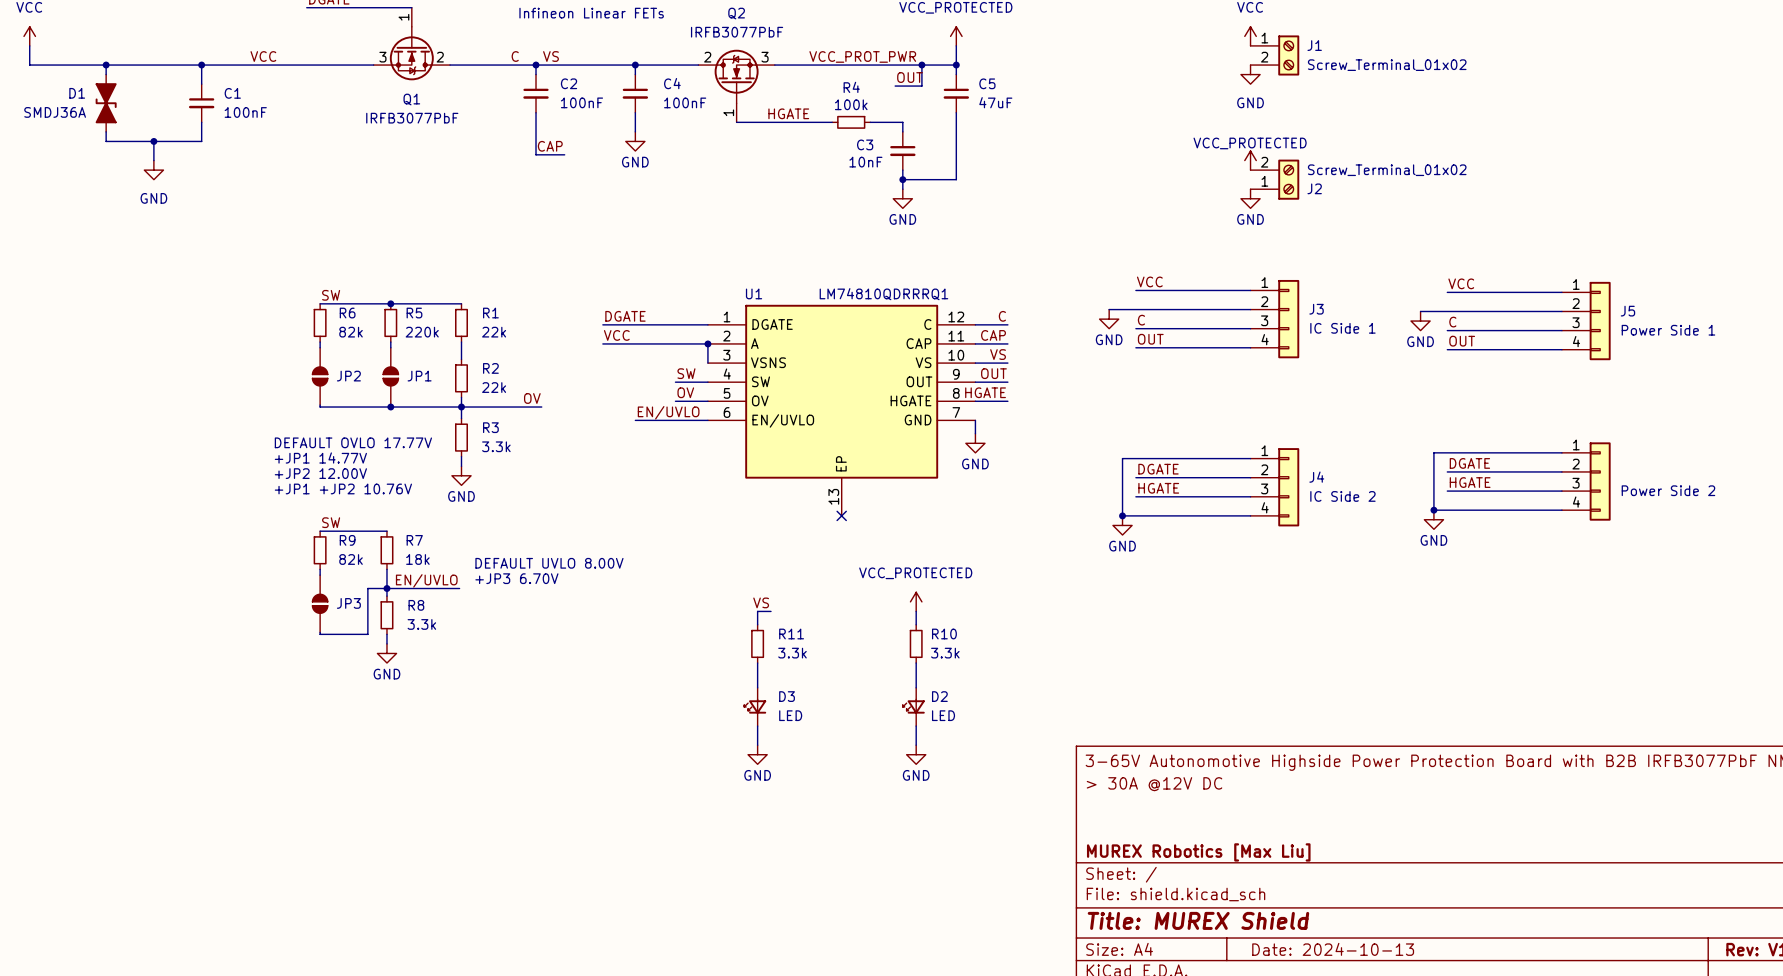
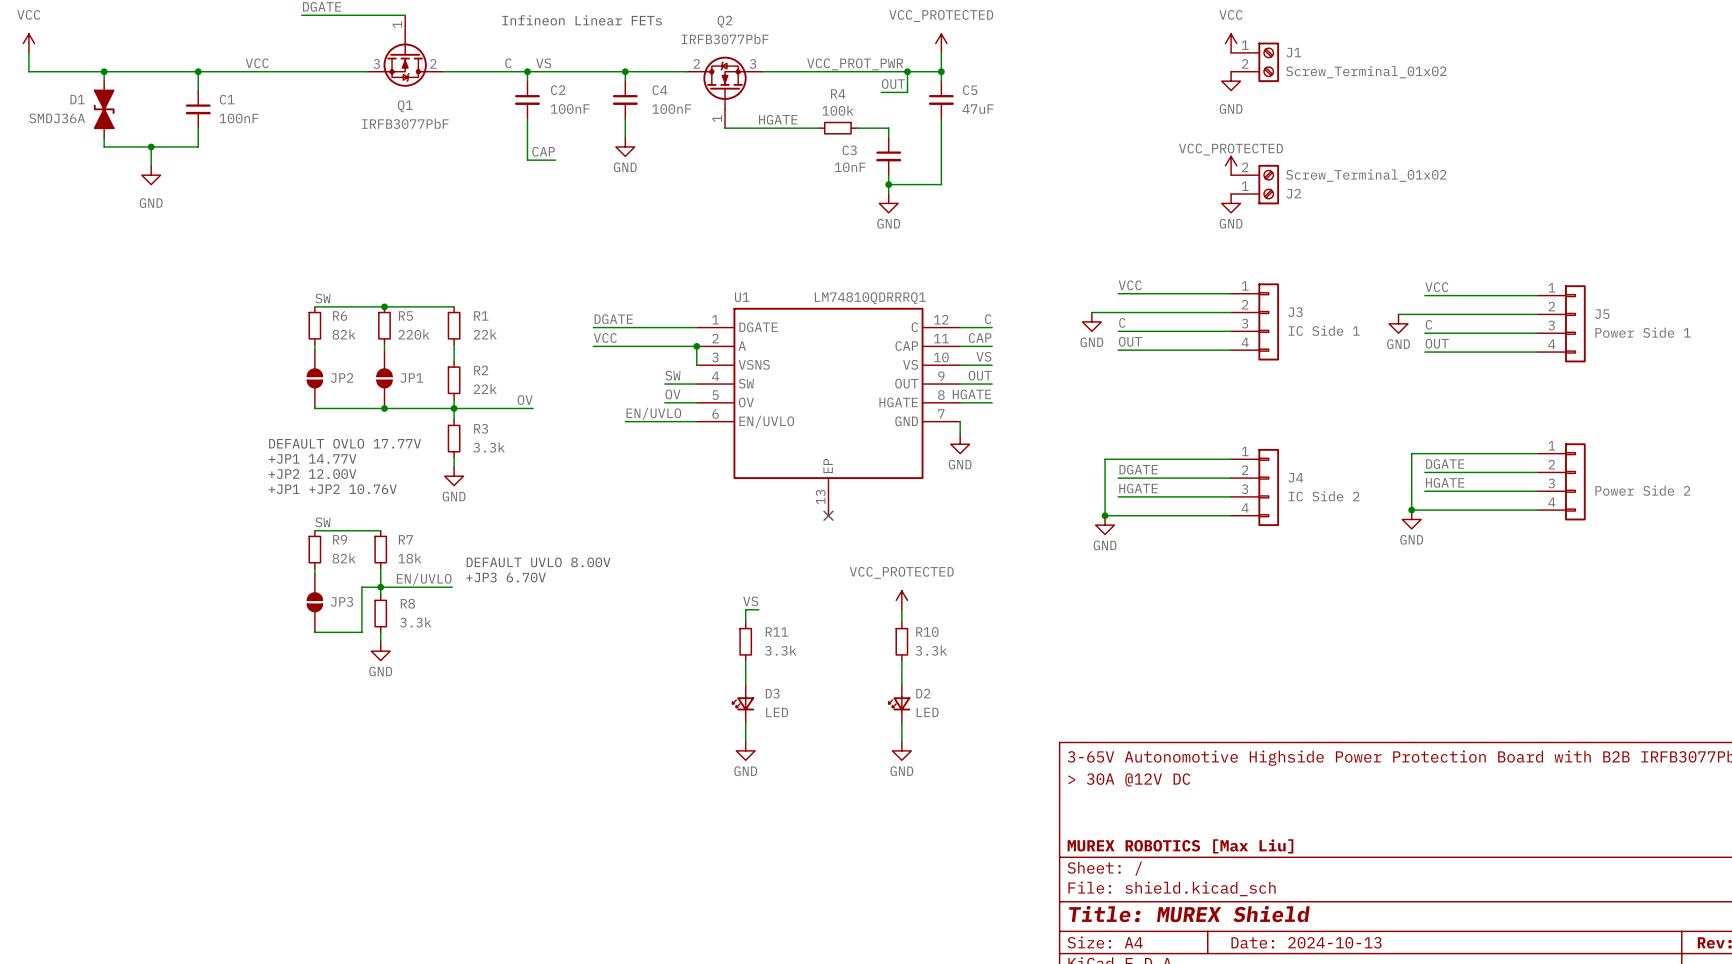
title block: MUREX Robotics [Max Liu] (1198, 852) -> MUREX ROBOTICS [Max Liu] (1180, 846)

